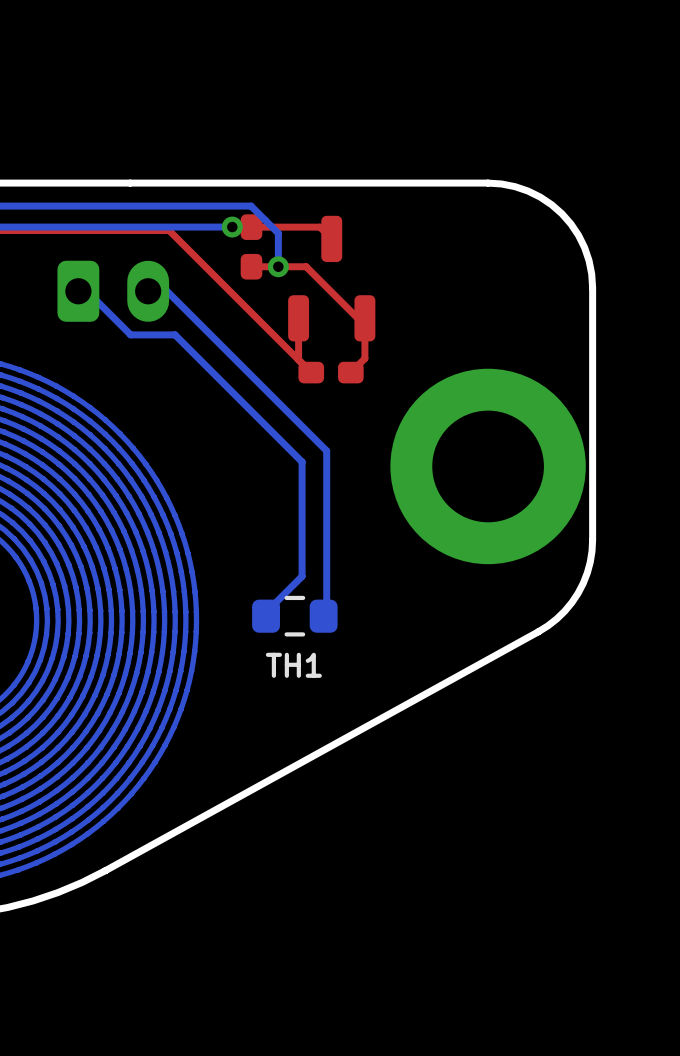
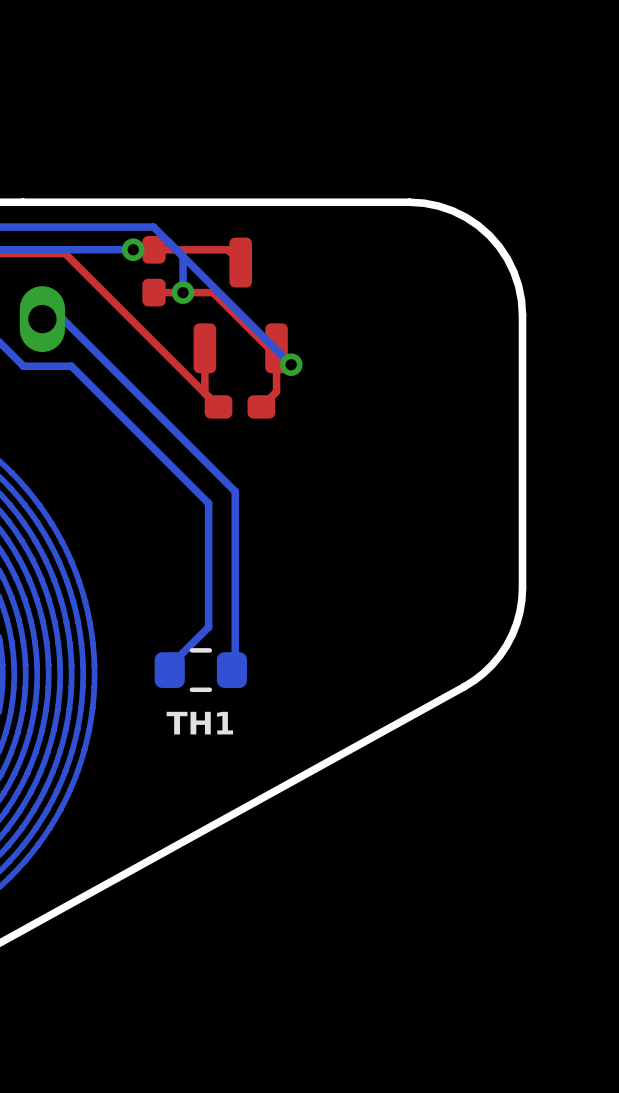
bottom track: none -> (183, 256) (291, 364)
via: none -> (291, 364)
part: (488, 466) -> none

